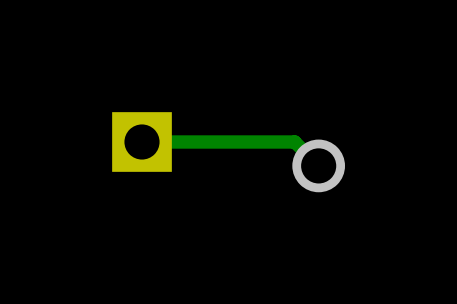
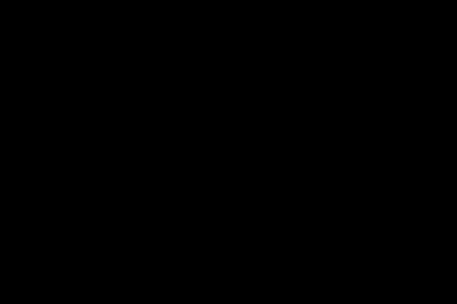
track: (142, 142) (294, 142) (318, 165) -> none
part: (142, 142) -> none
via: (318, 165) -> none

